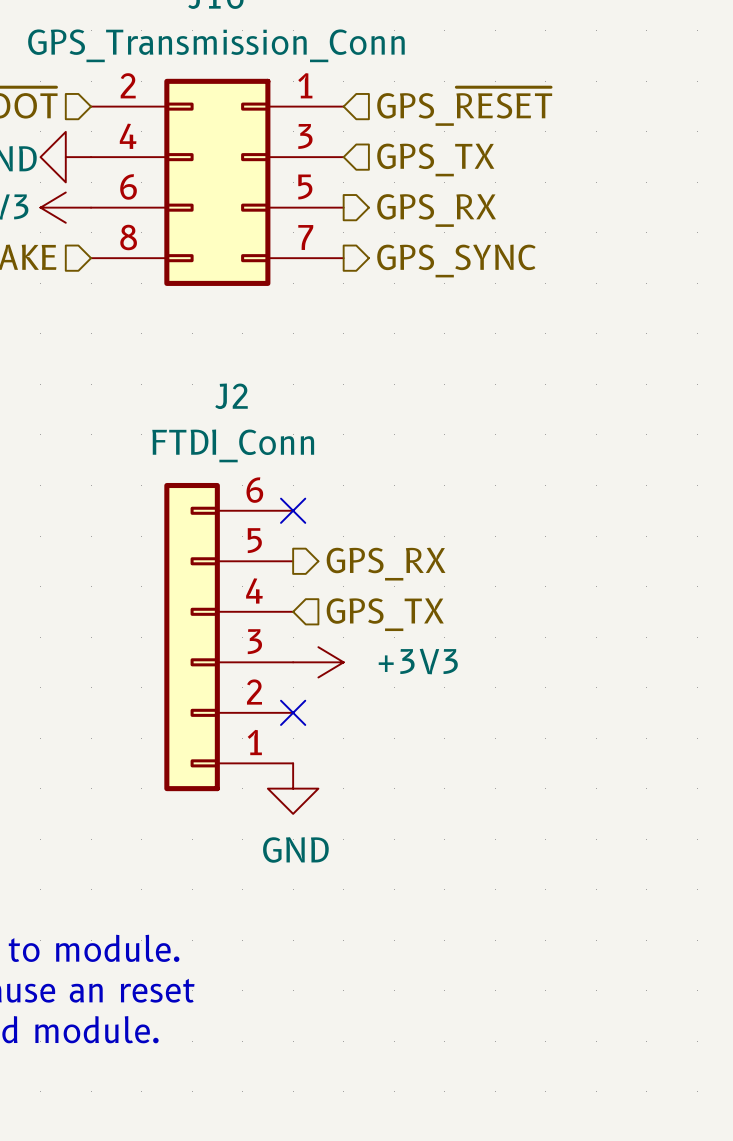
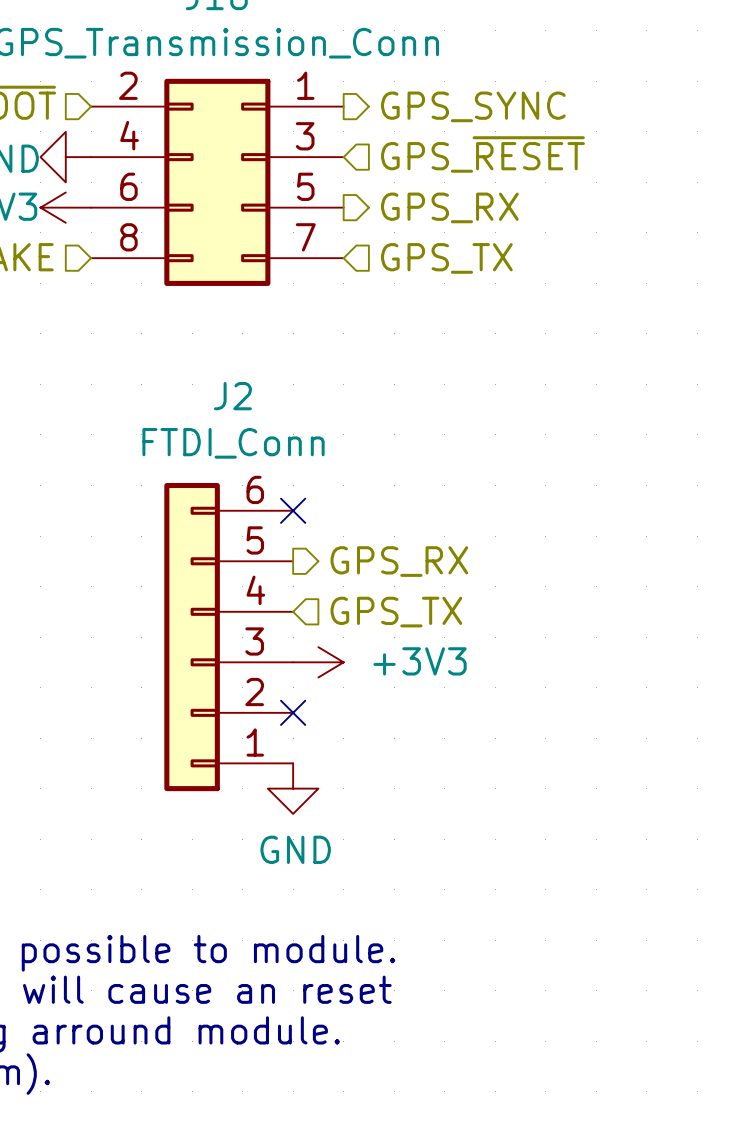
hierarchical label shape: input (464, 106) -> output (473, 106)
hierarchical label: GPS_~{RESET} (464, 106) -> GPS_SYNC (473, 106)
hierarchical label: GPS_TX (435, 159) -> GPS_~{RESET} (482, 154)
hierarchical label shape: output (456, 261) -> input (446, 258)
hierarchical label: GPS_SYNC (456, 261) -> GPS_TX (446, 258)

